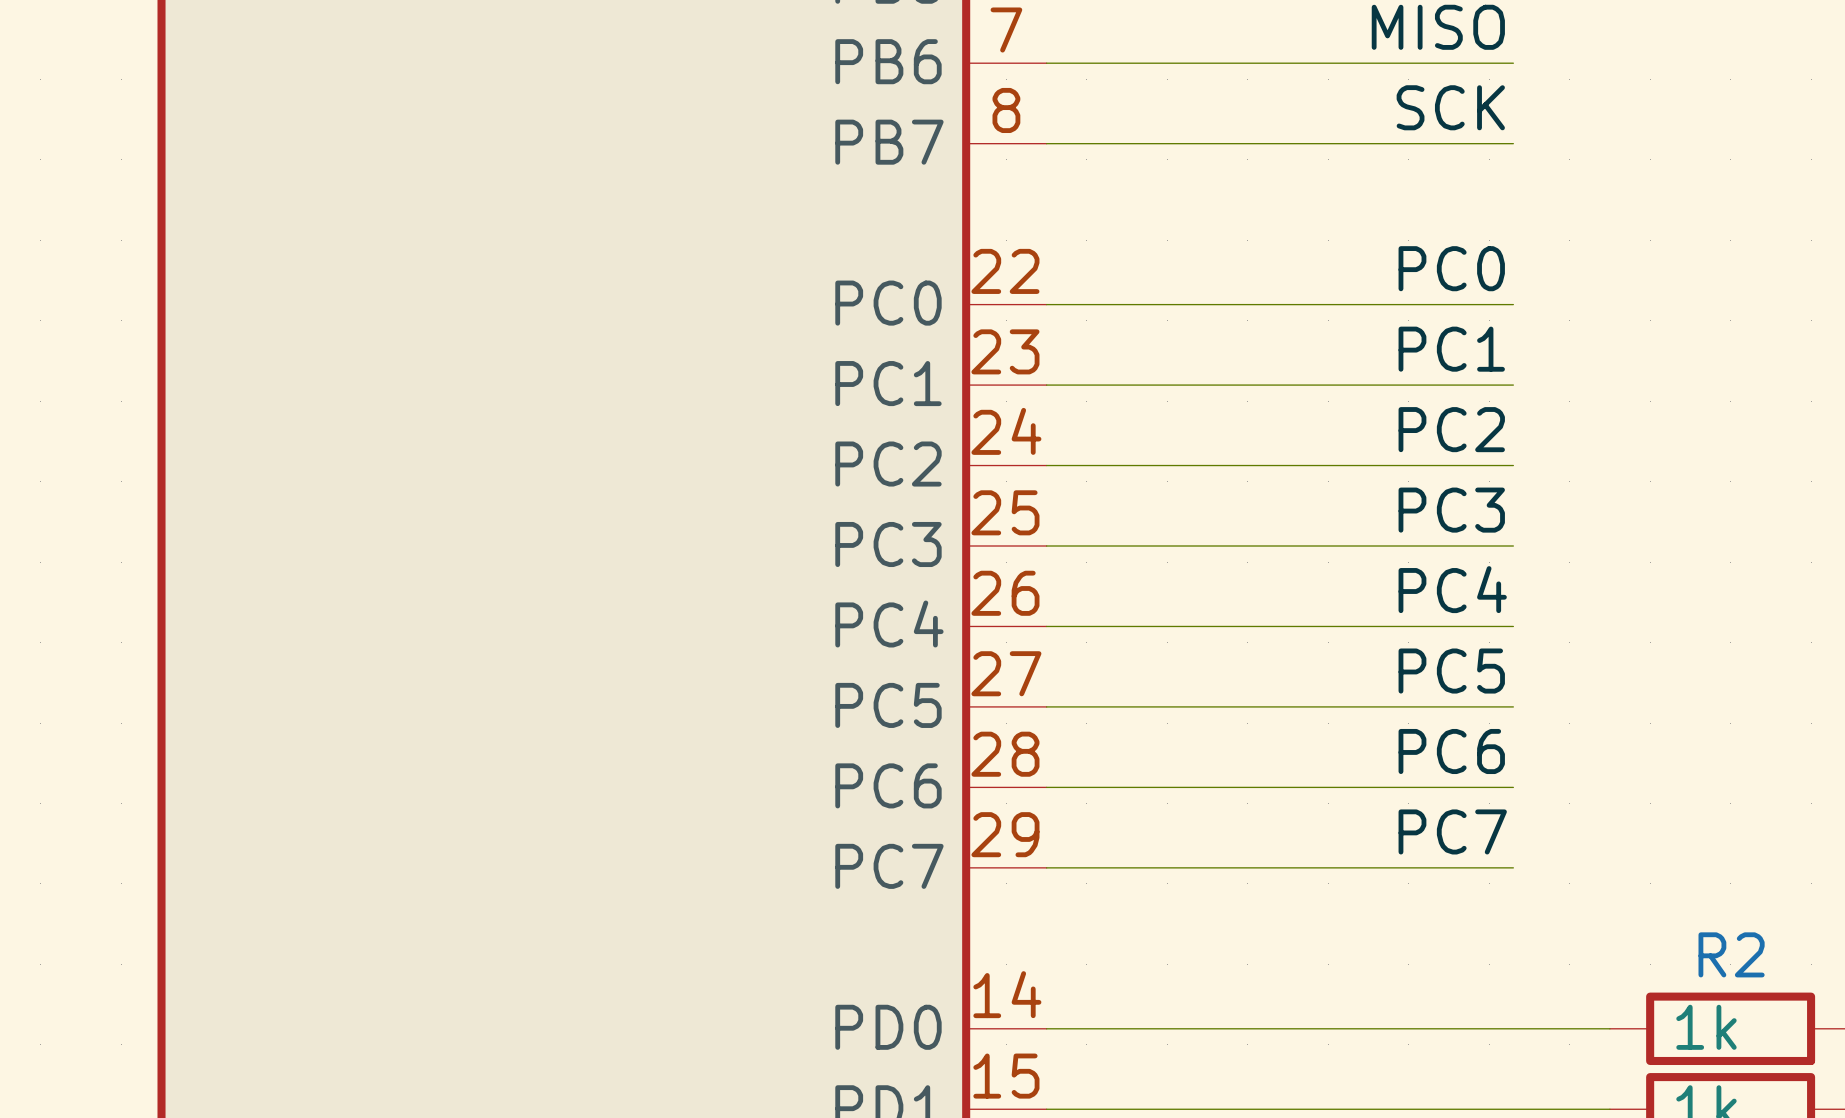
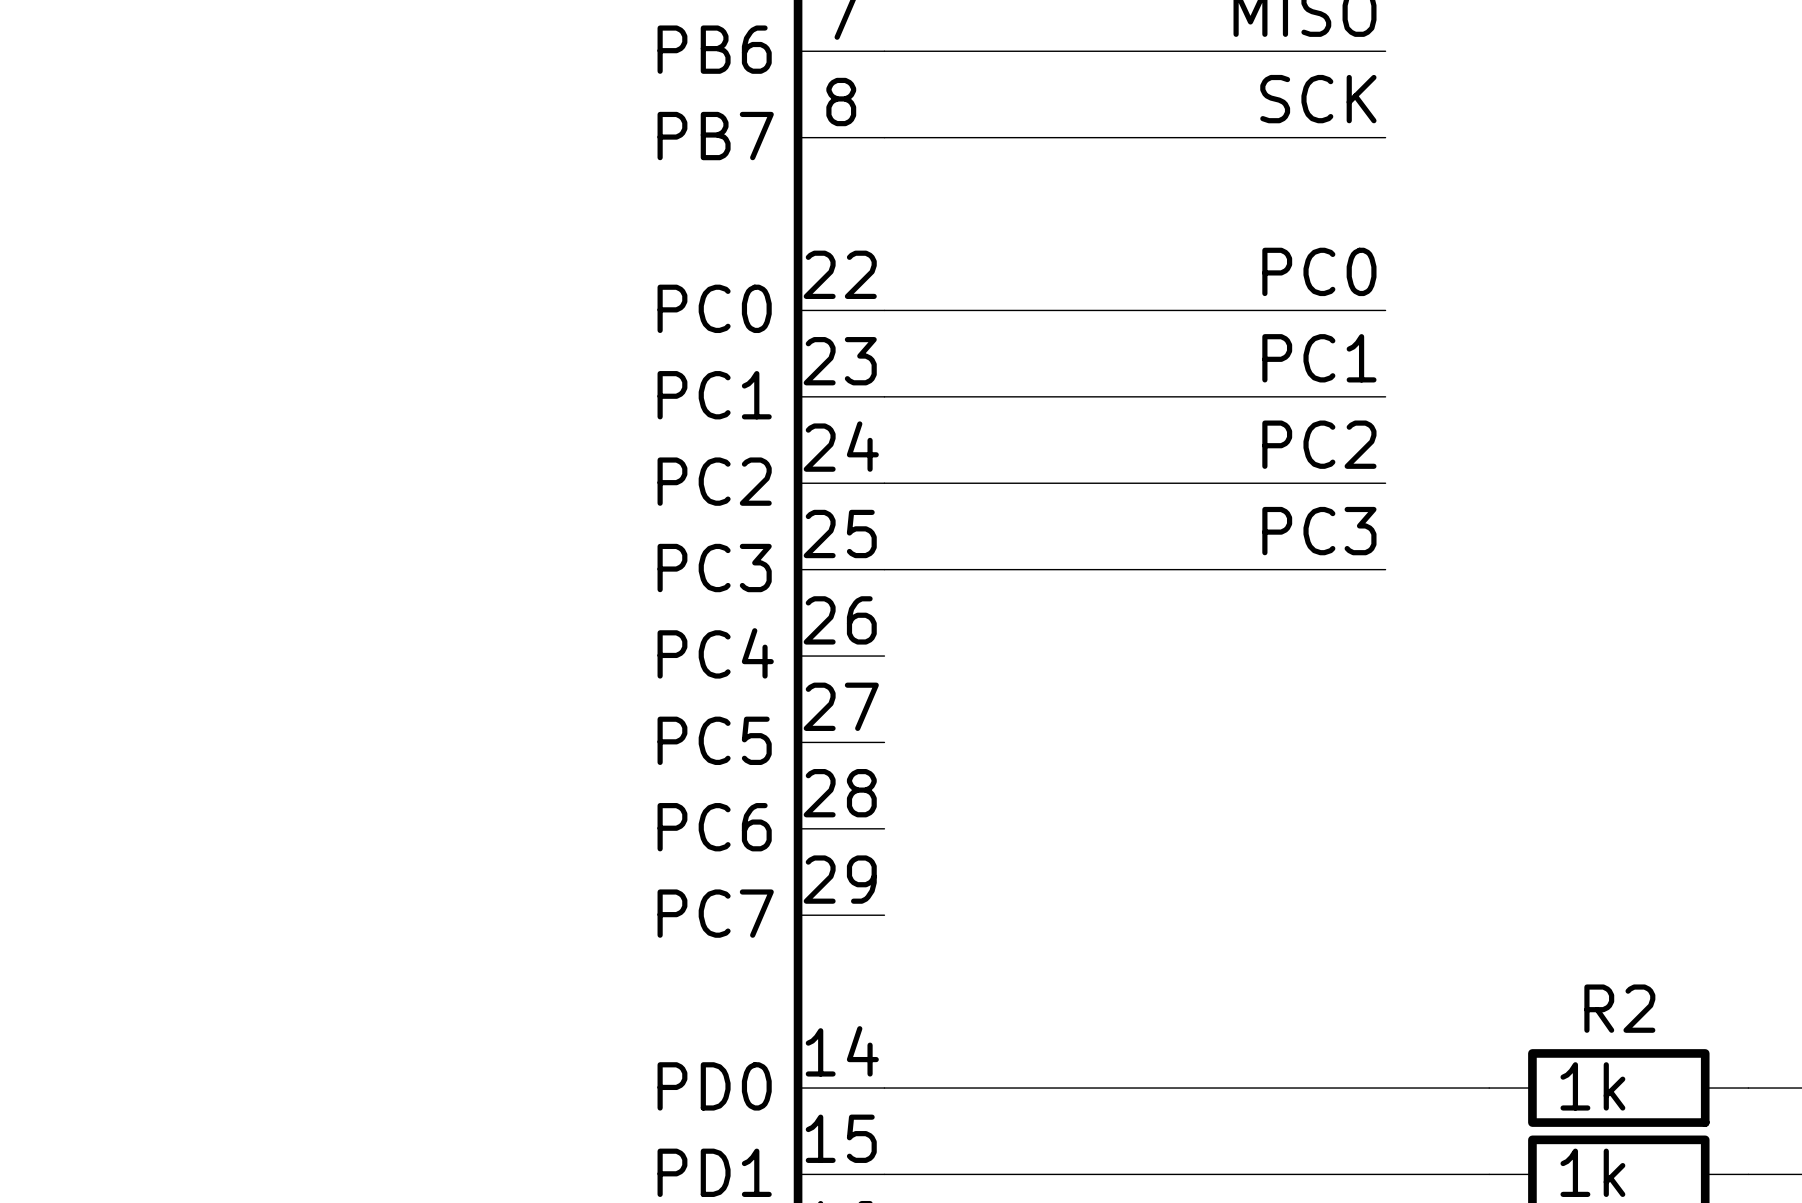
label: PC4 (1452, 589) -> none
wire: (1046, 626) (1513, 626) -> none
label: PC5 (1451, 671) -> none
wire: (1046, 706) (1513, 706) -> none
label: PC6 (1451, 751) -> none
wire: (1046, 787) (1513, 787) -> none
label: PC7 (1452, 831) -> none
wire: (1046, 867) (1513, 867) -> none

